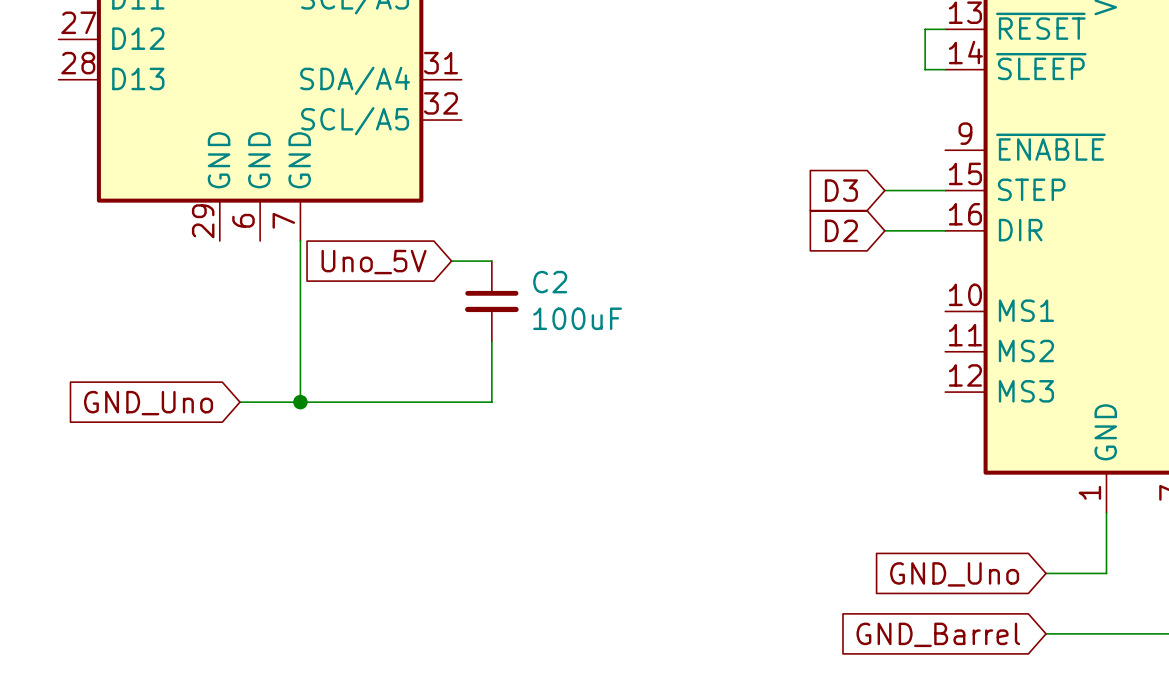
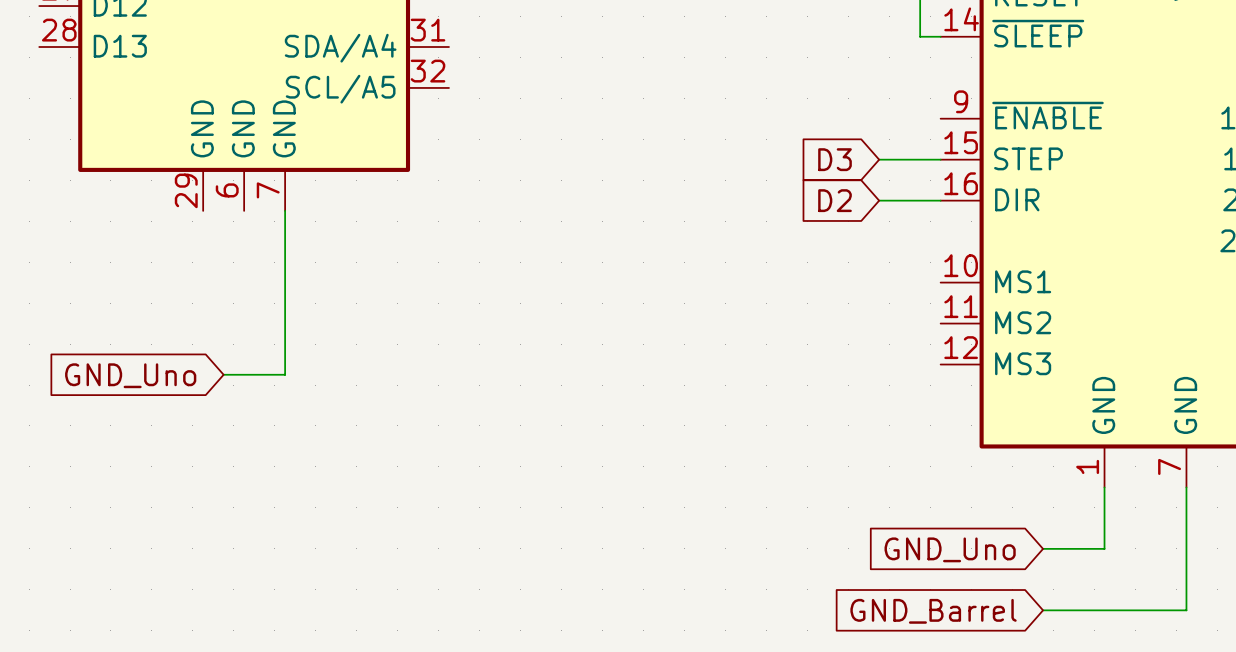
wire: (451, 261) (491, 261) -> none
global label: Uno_5V (374, 262) -> none
C2: 100uF (491, 301) -> none
wire: (491, 341) (491, 402) (300, 402) -> none
junction: (300, 402) -> none

